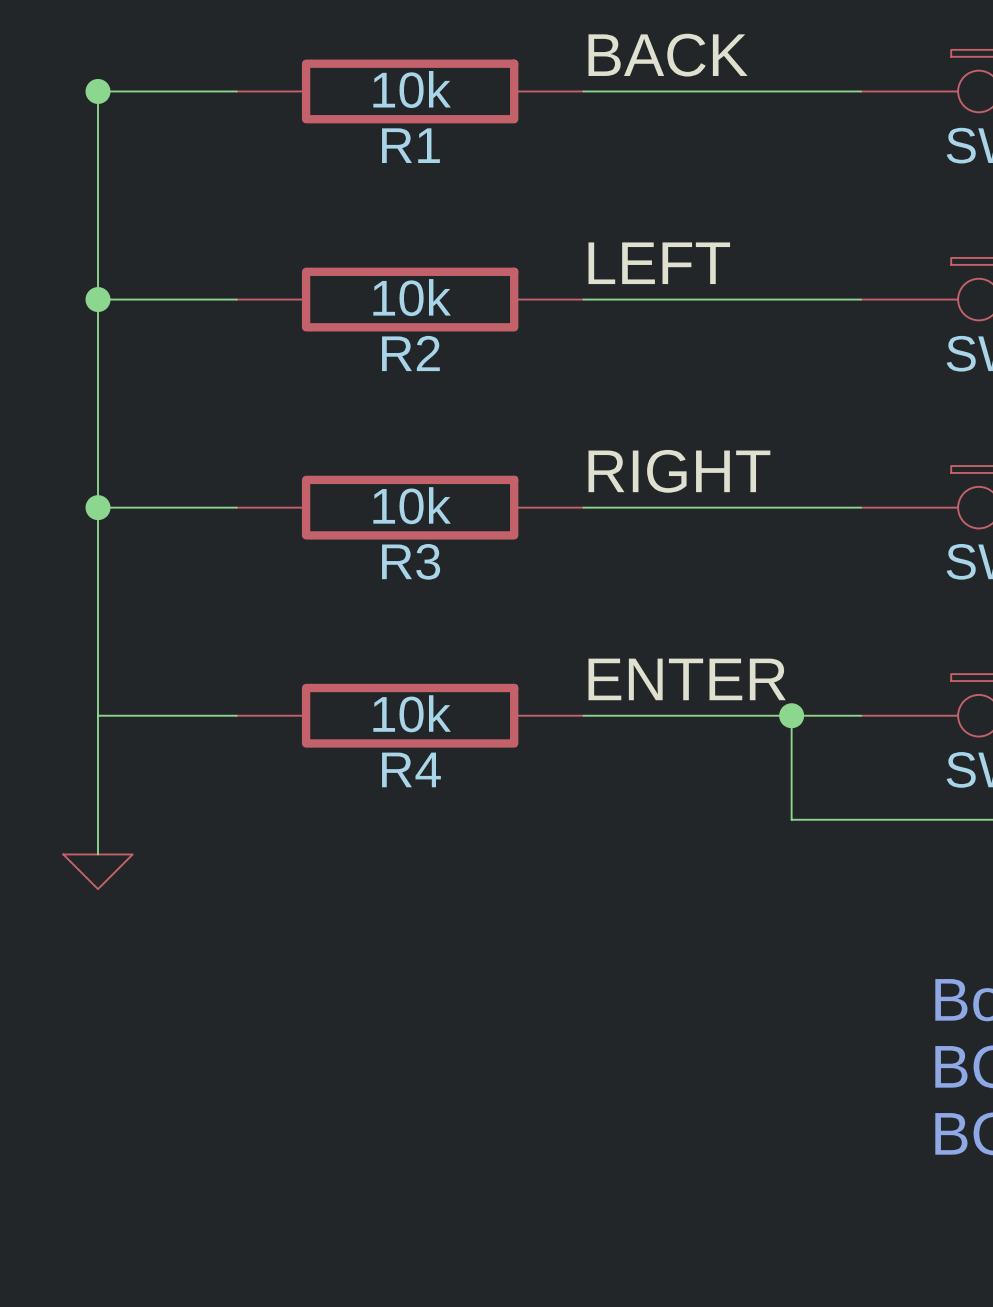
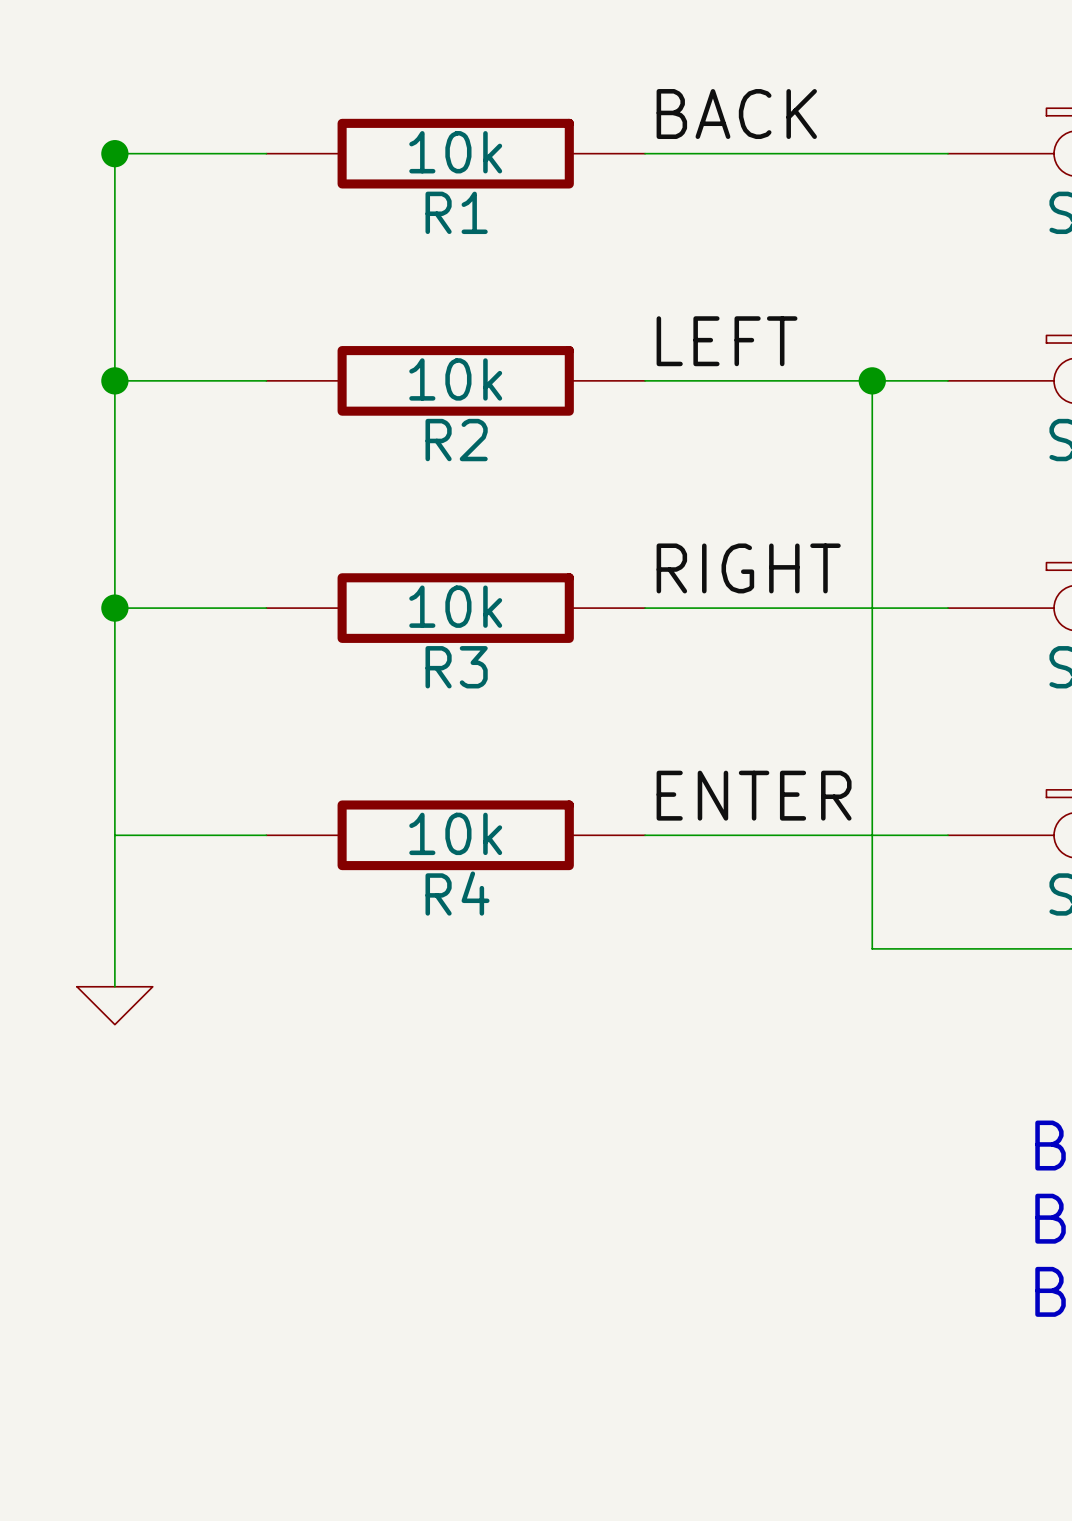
wire: none -> (872, 380) (872, 835)
junction: none -> (872, 380)
junction: (791, 715) -> none

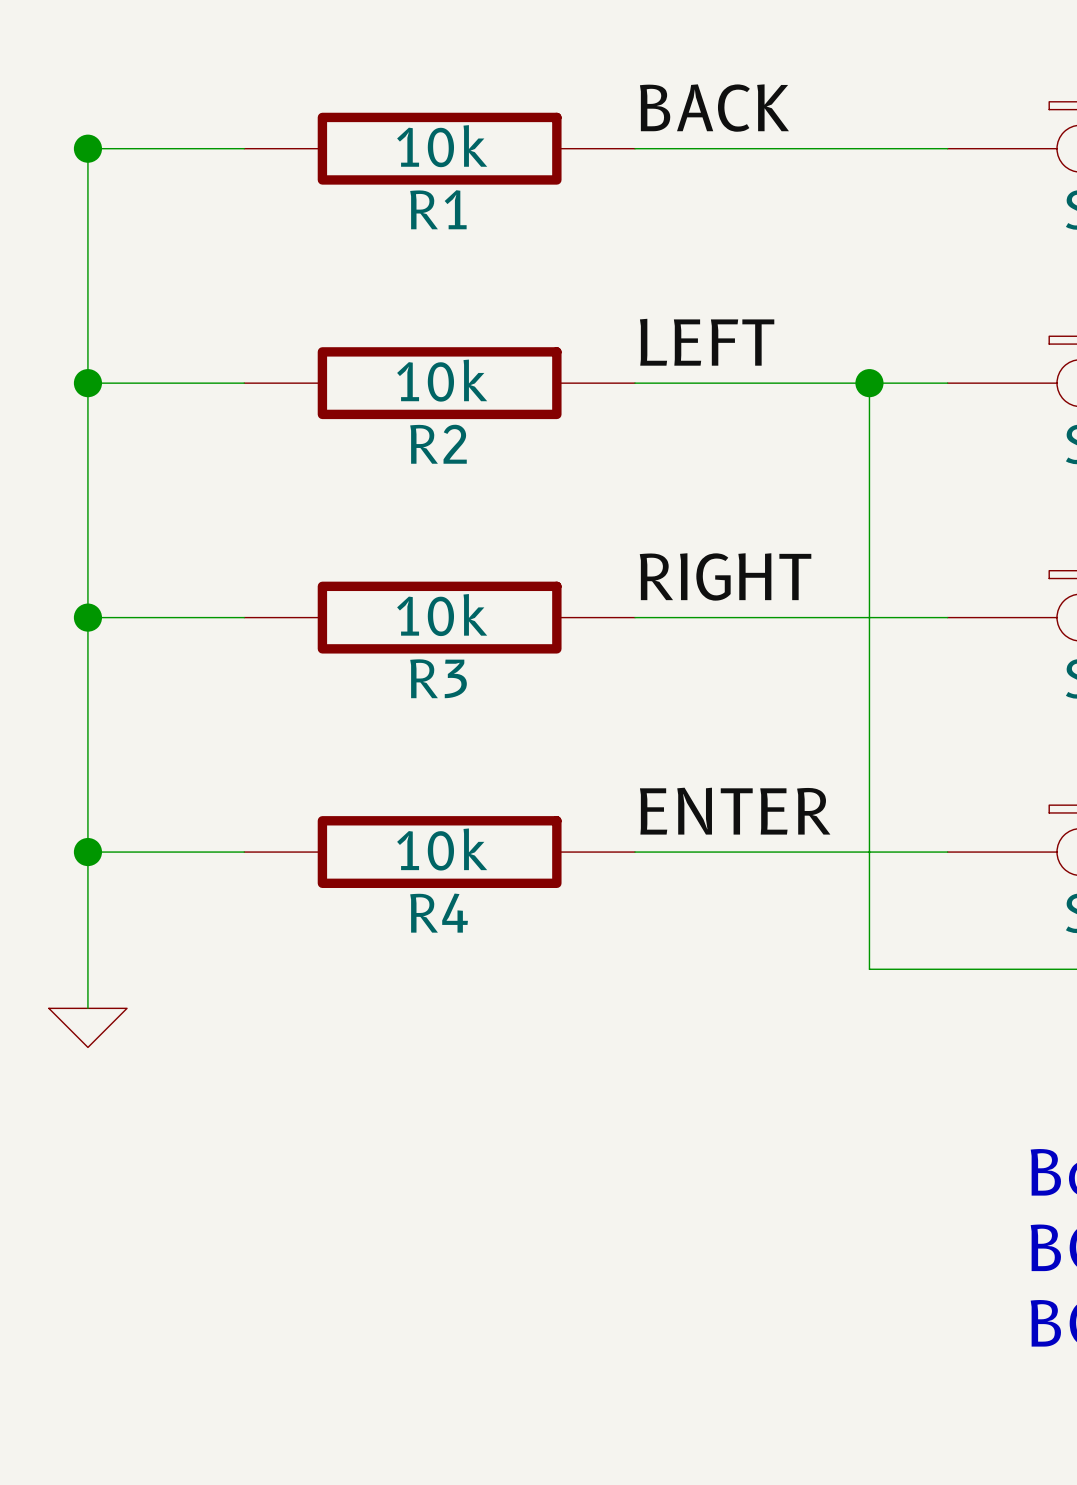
junction: none -> (87, 852)

